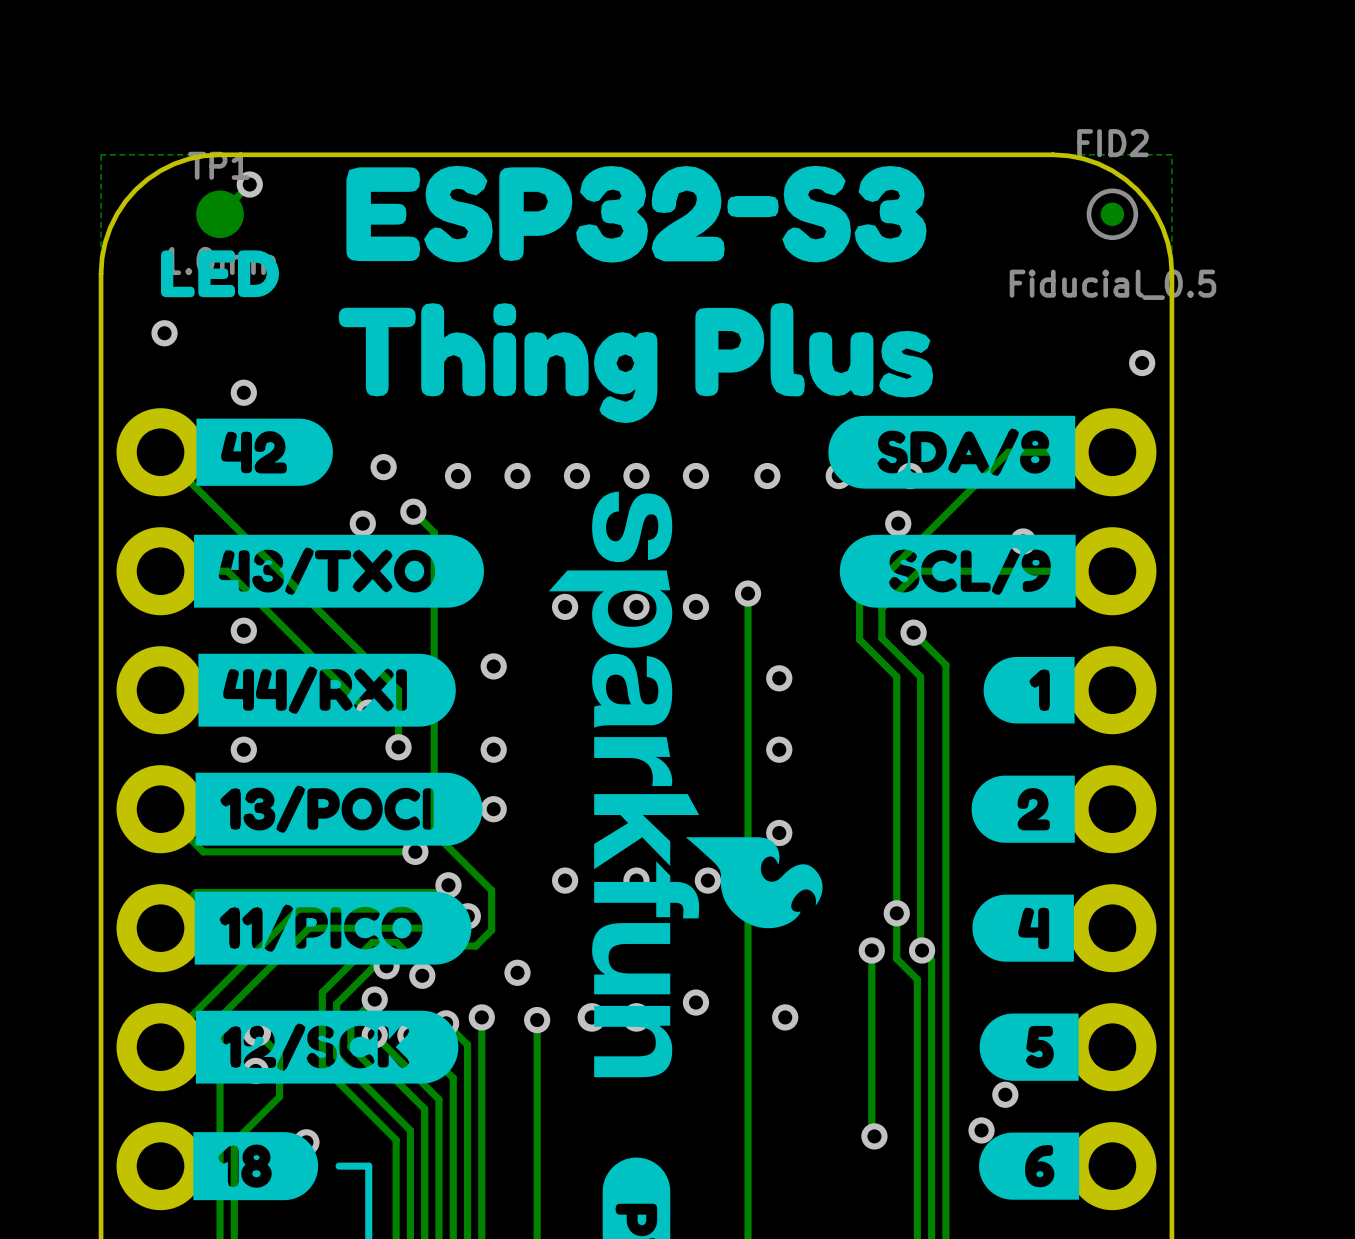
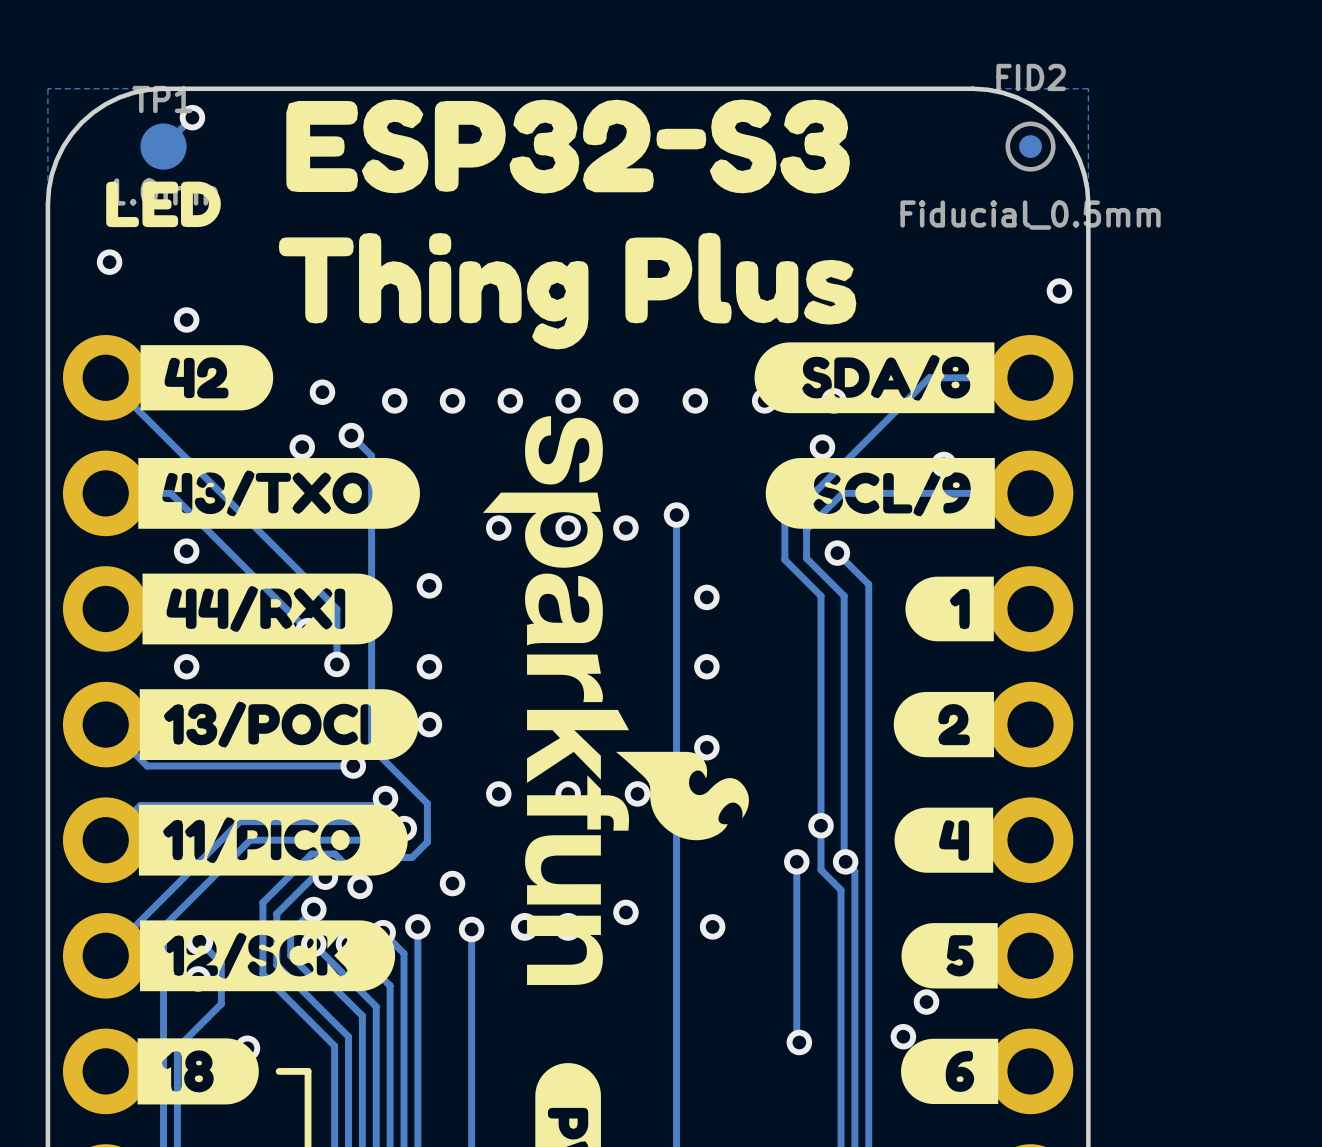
FID2 value: Fiducial_0.5 (1112, 284) -> Fiducial_0.5mm (1030, 215)

